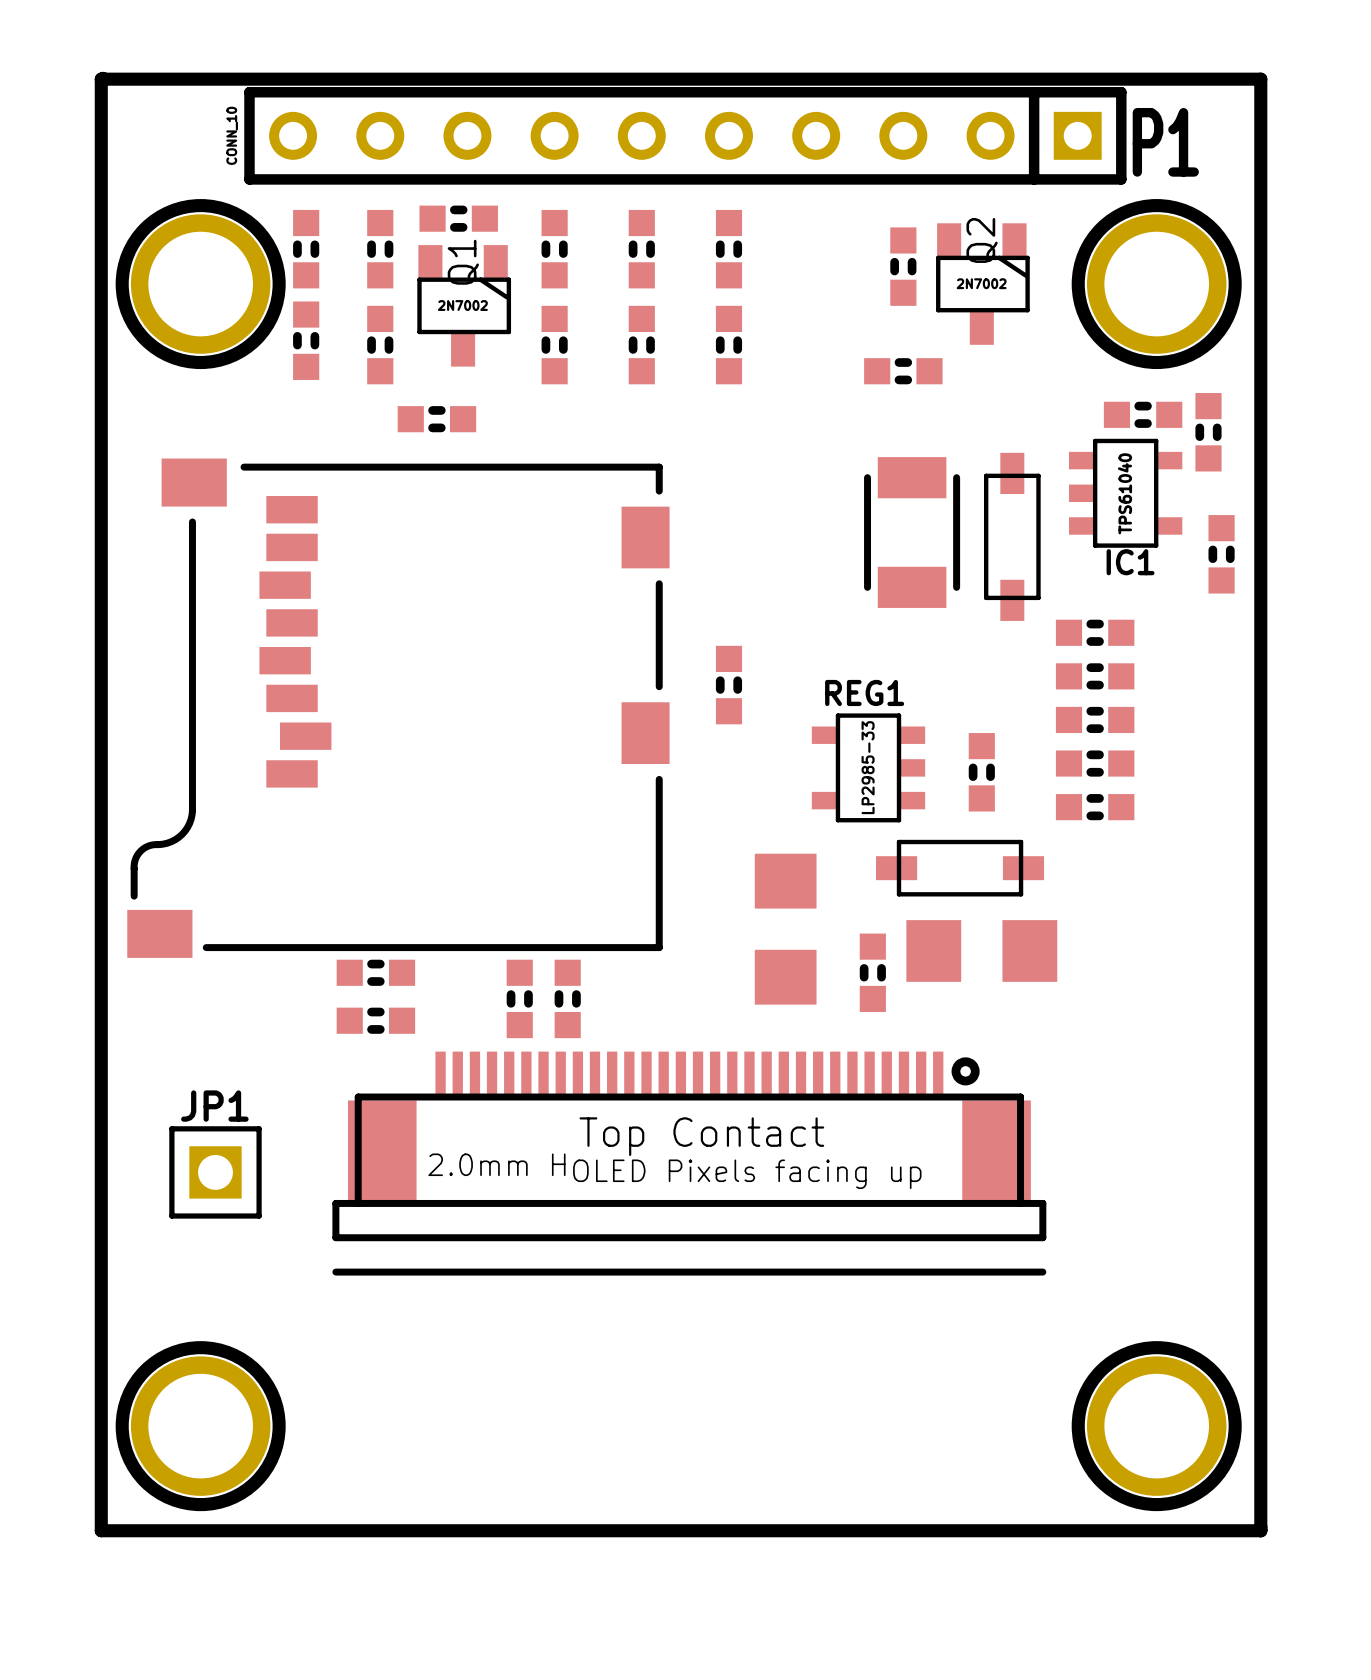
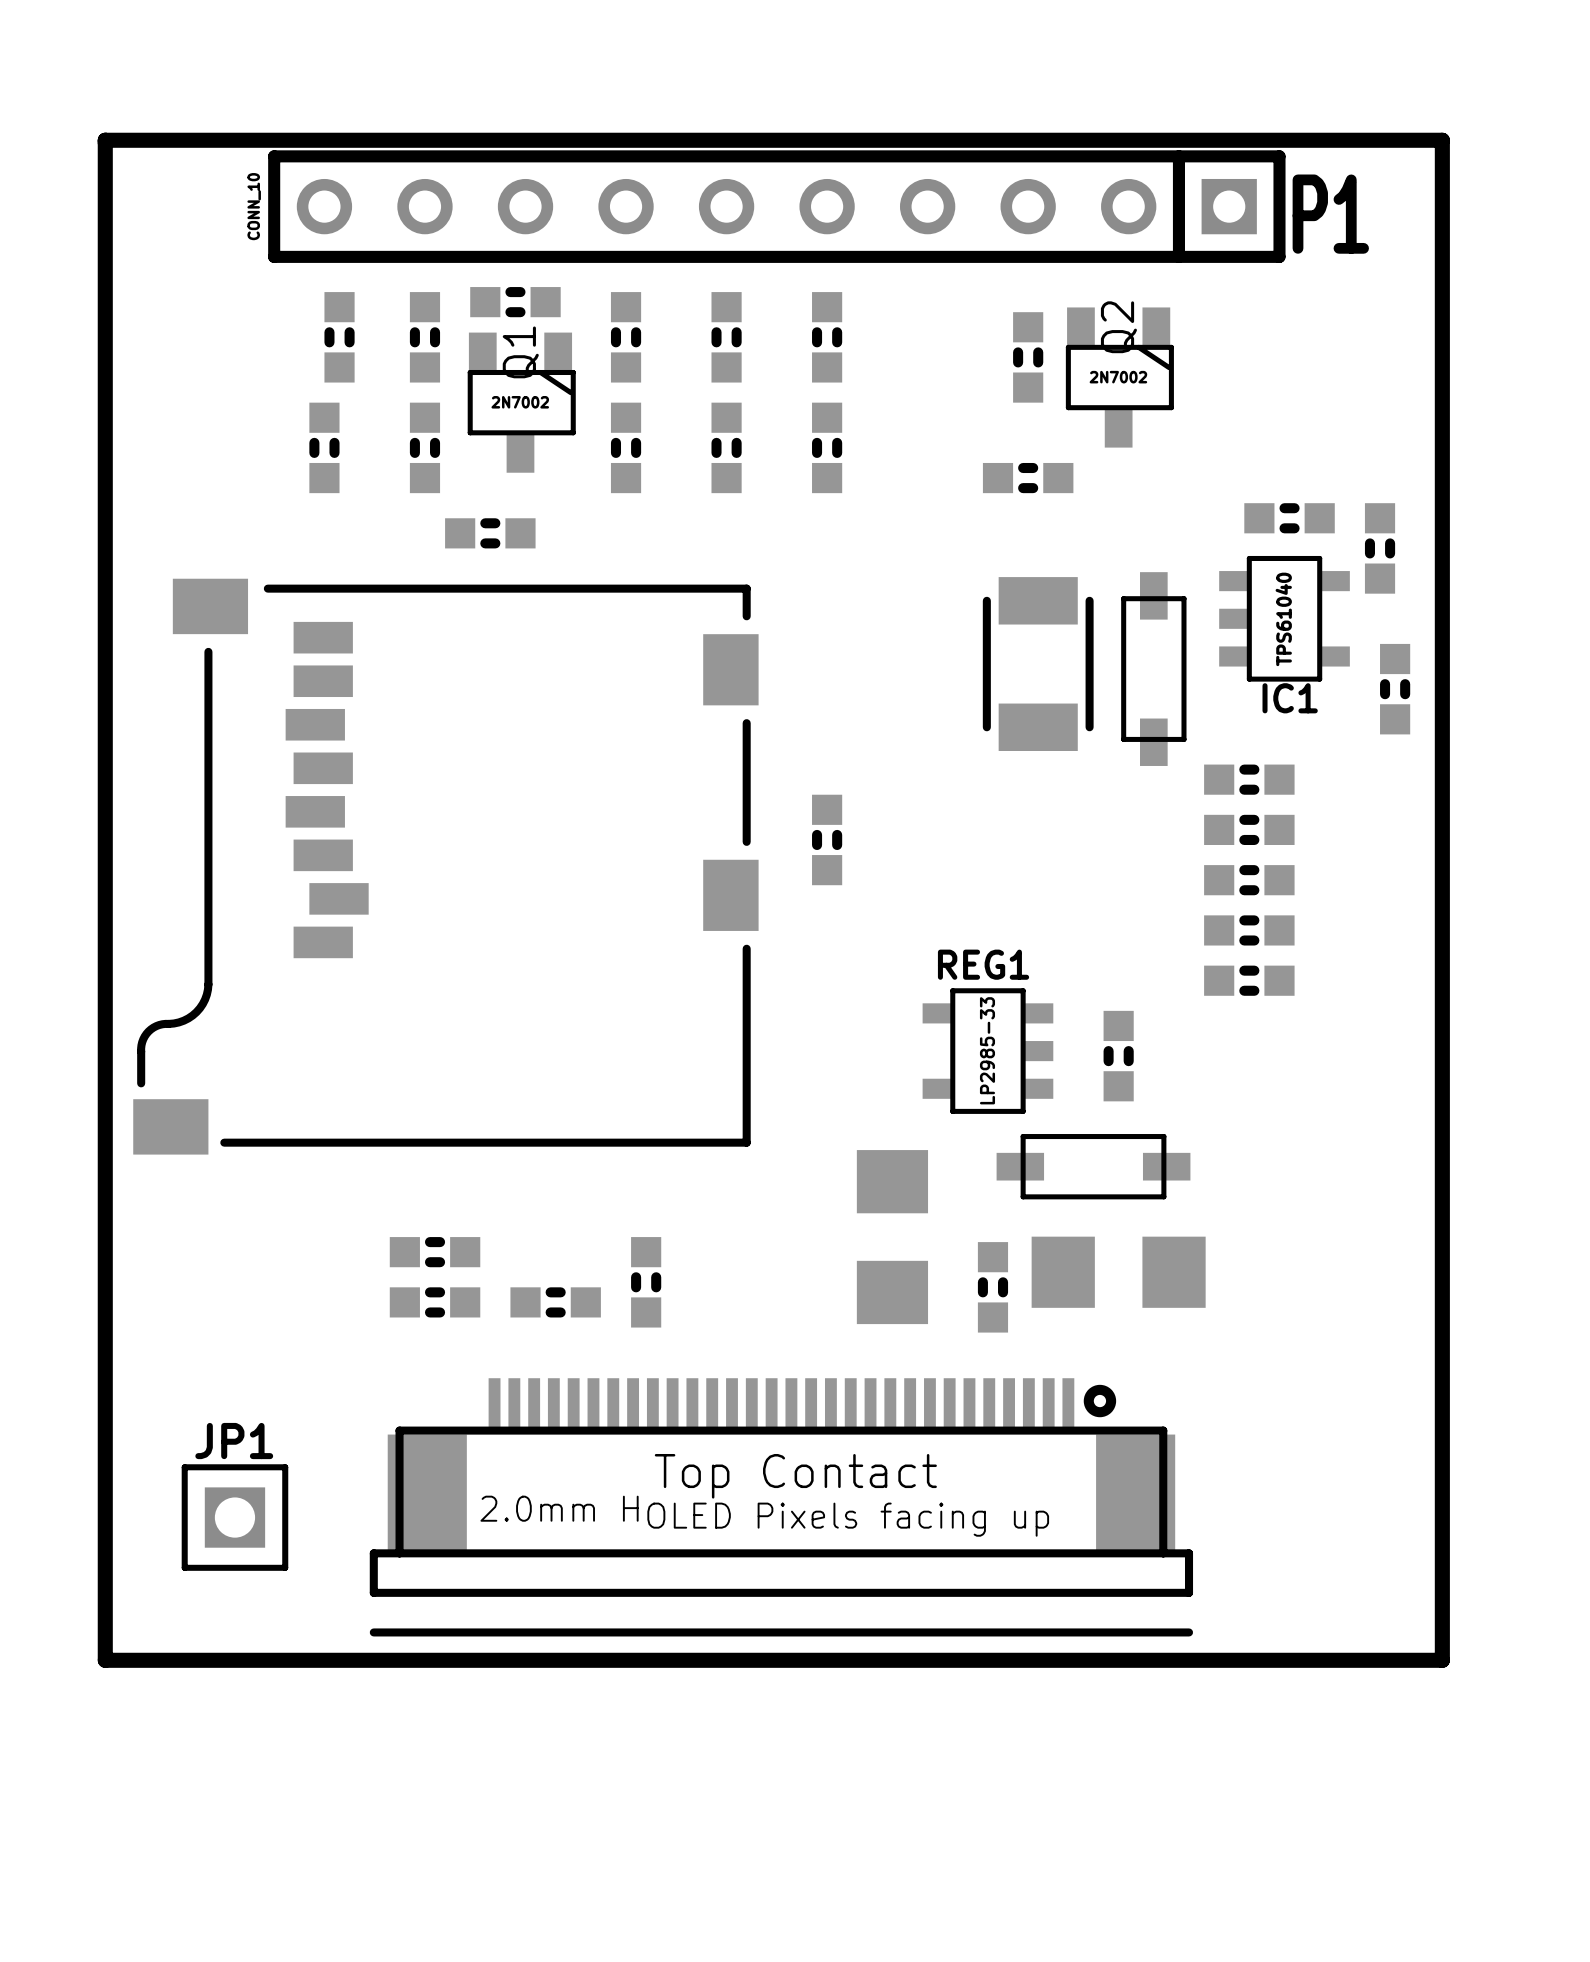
board edge: none -> (105, 140) (1442, 140) (1442, 1660) (105, 1660) (105, 143)
board edge: (101, 79) (1260, 79) (1260, 1530) (101, 1530) (101, 79) -> none
part: (200, 284) -> none
part: (1156, 284) -> none
part position: (306, 340) -> (324, 447)
part position: (1143, 414) -> (1289, 518)
REG1 position: (868, 767) -> (987, 1051)
part: (981, 772) -> none
part footprint: [875, 839, 1045, 897] -> [1103, 1010, 1134, 1102]
part footprint: [906, 920, 1058, 982] -> [996, 1134, 1191, 1200]
part position: (785, 929) -> (892, 1237)
part: (375, 972) -> none
part position: (872, 972) -> (992, 1287)
part: (519, 998) -> none
part: (567, 998) -> none
part position: (375, 1020) -> (435, 1252)
part: none -> (1118, 1272)
part: none -> (646, 1282)
part: none -> (435, 1302)
part: none -> (555, 1302)
part position: (689, 1163) -> (781, 1507)
JP1 position: (215, 1172) -> (234, 1517)
part: (200, 1426) -> none
part: (1156, 1426) -> none

